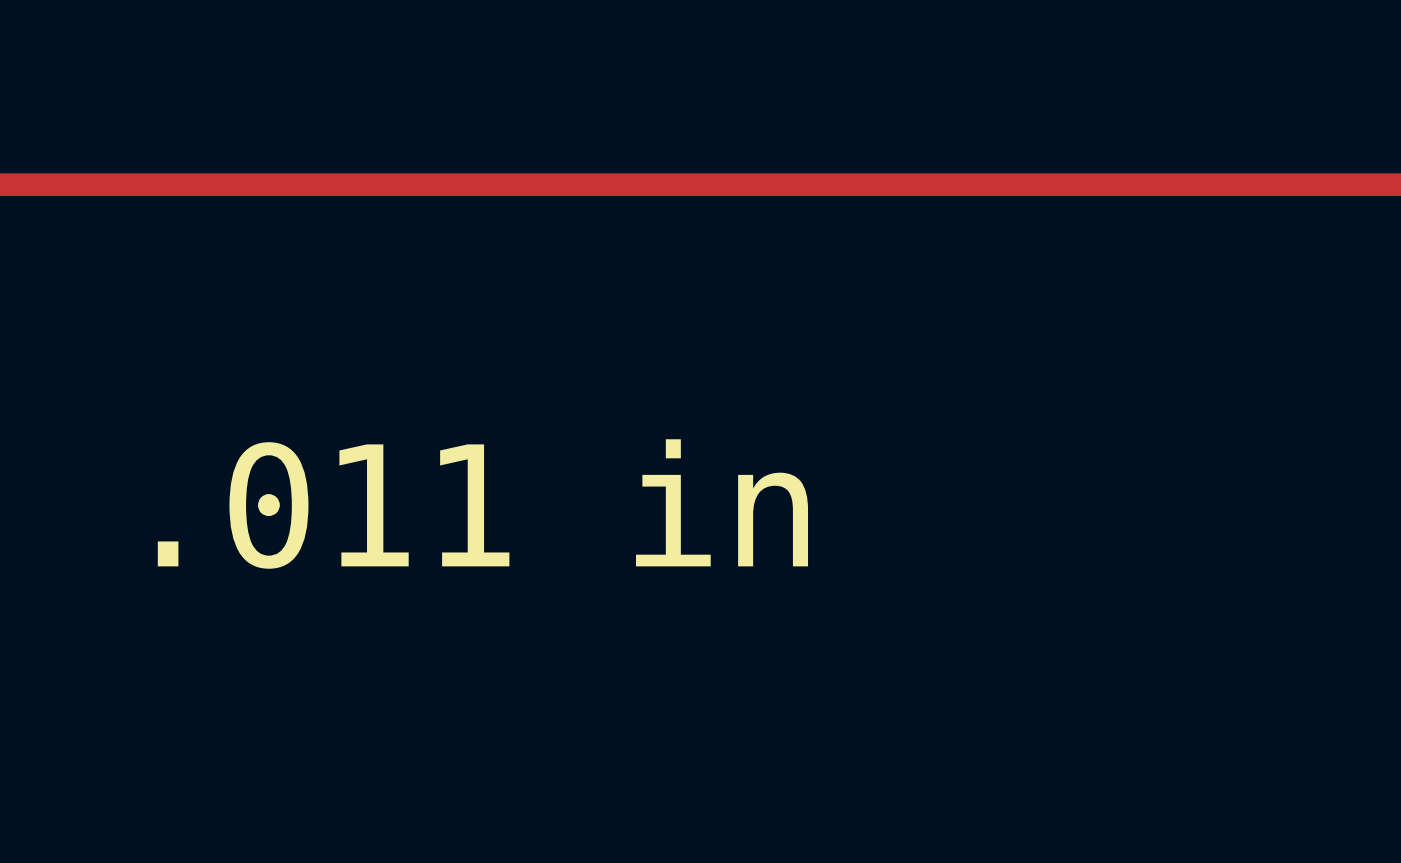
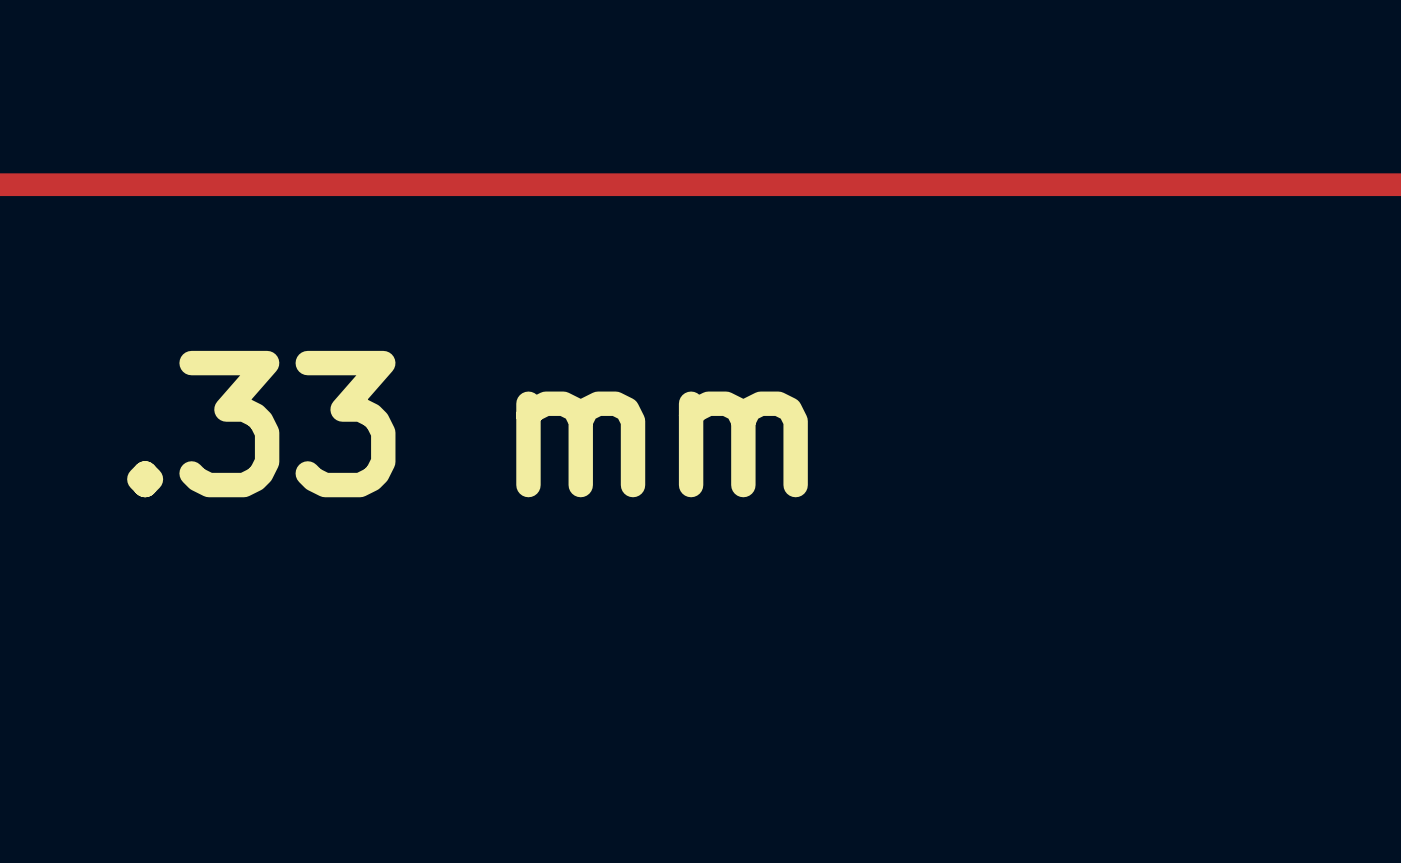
text: .011 in (482, 504) -> .33 mm (467, 424)

